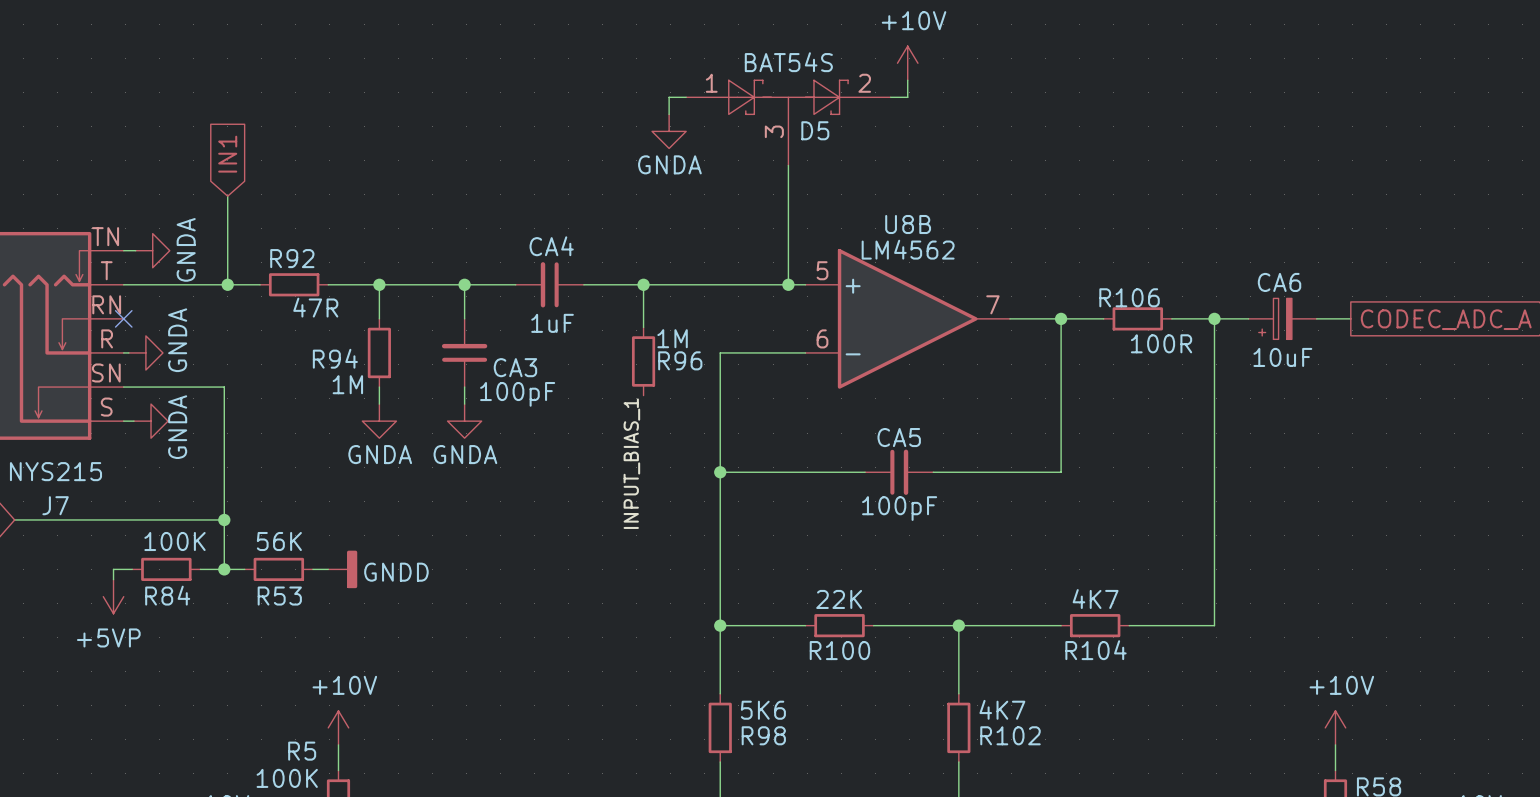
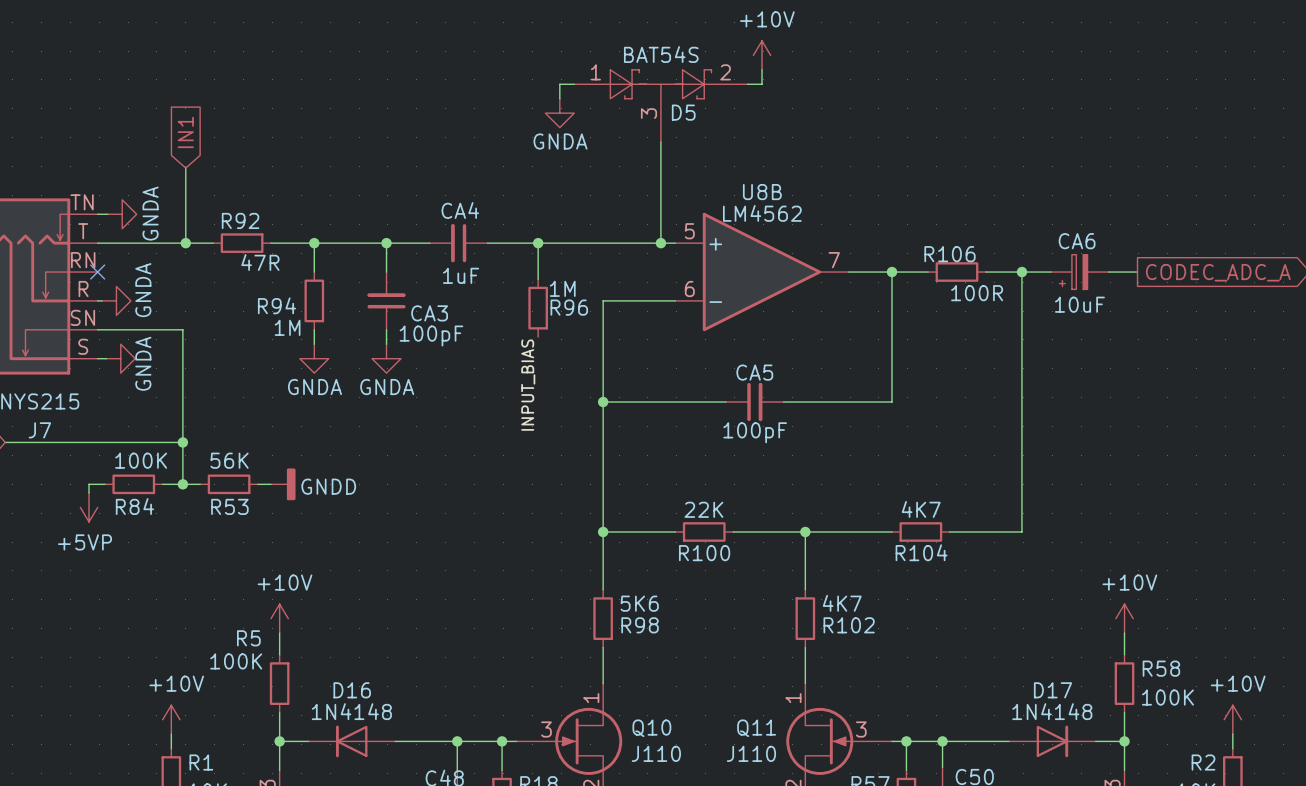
label: INPUT_BIAS_1 (631, 463) -> INPUT_BIAS (528, 385)

